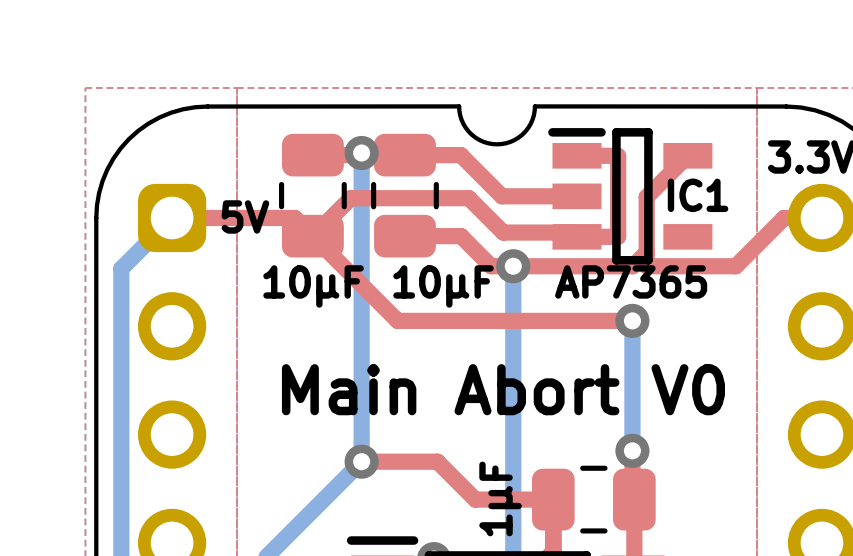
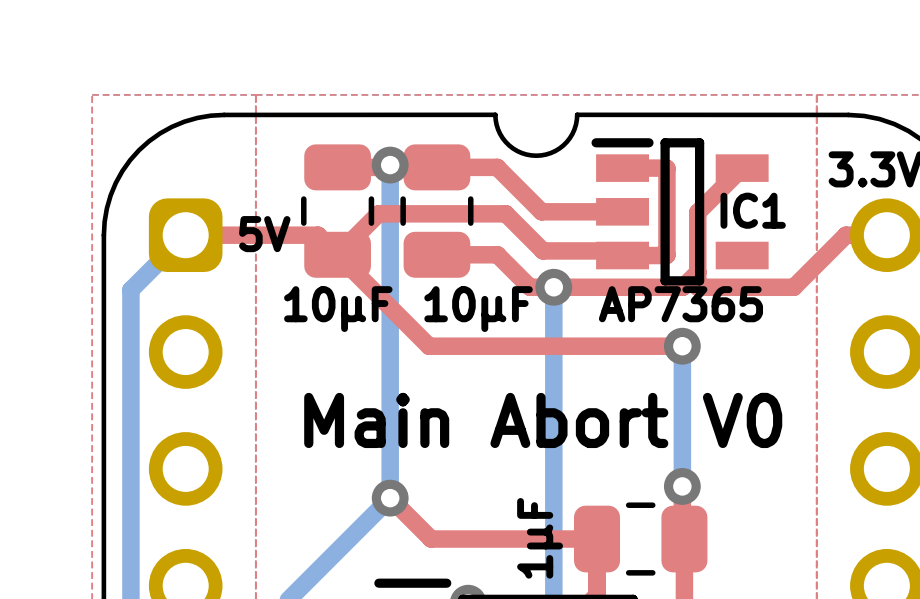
top track: (361, 461) (437, 461) (475, 499) -> (390, 498) (431, 539) (512, 539)

